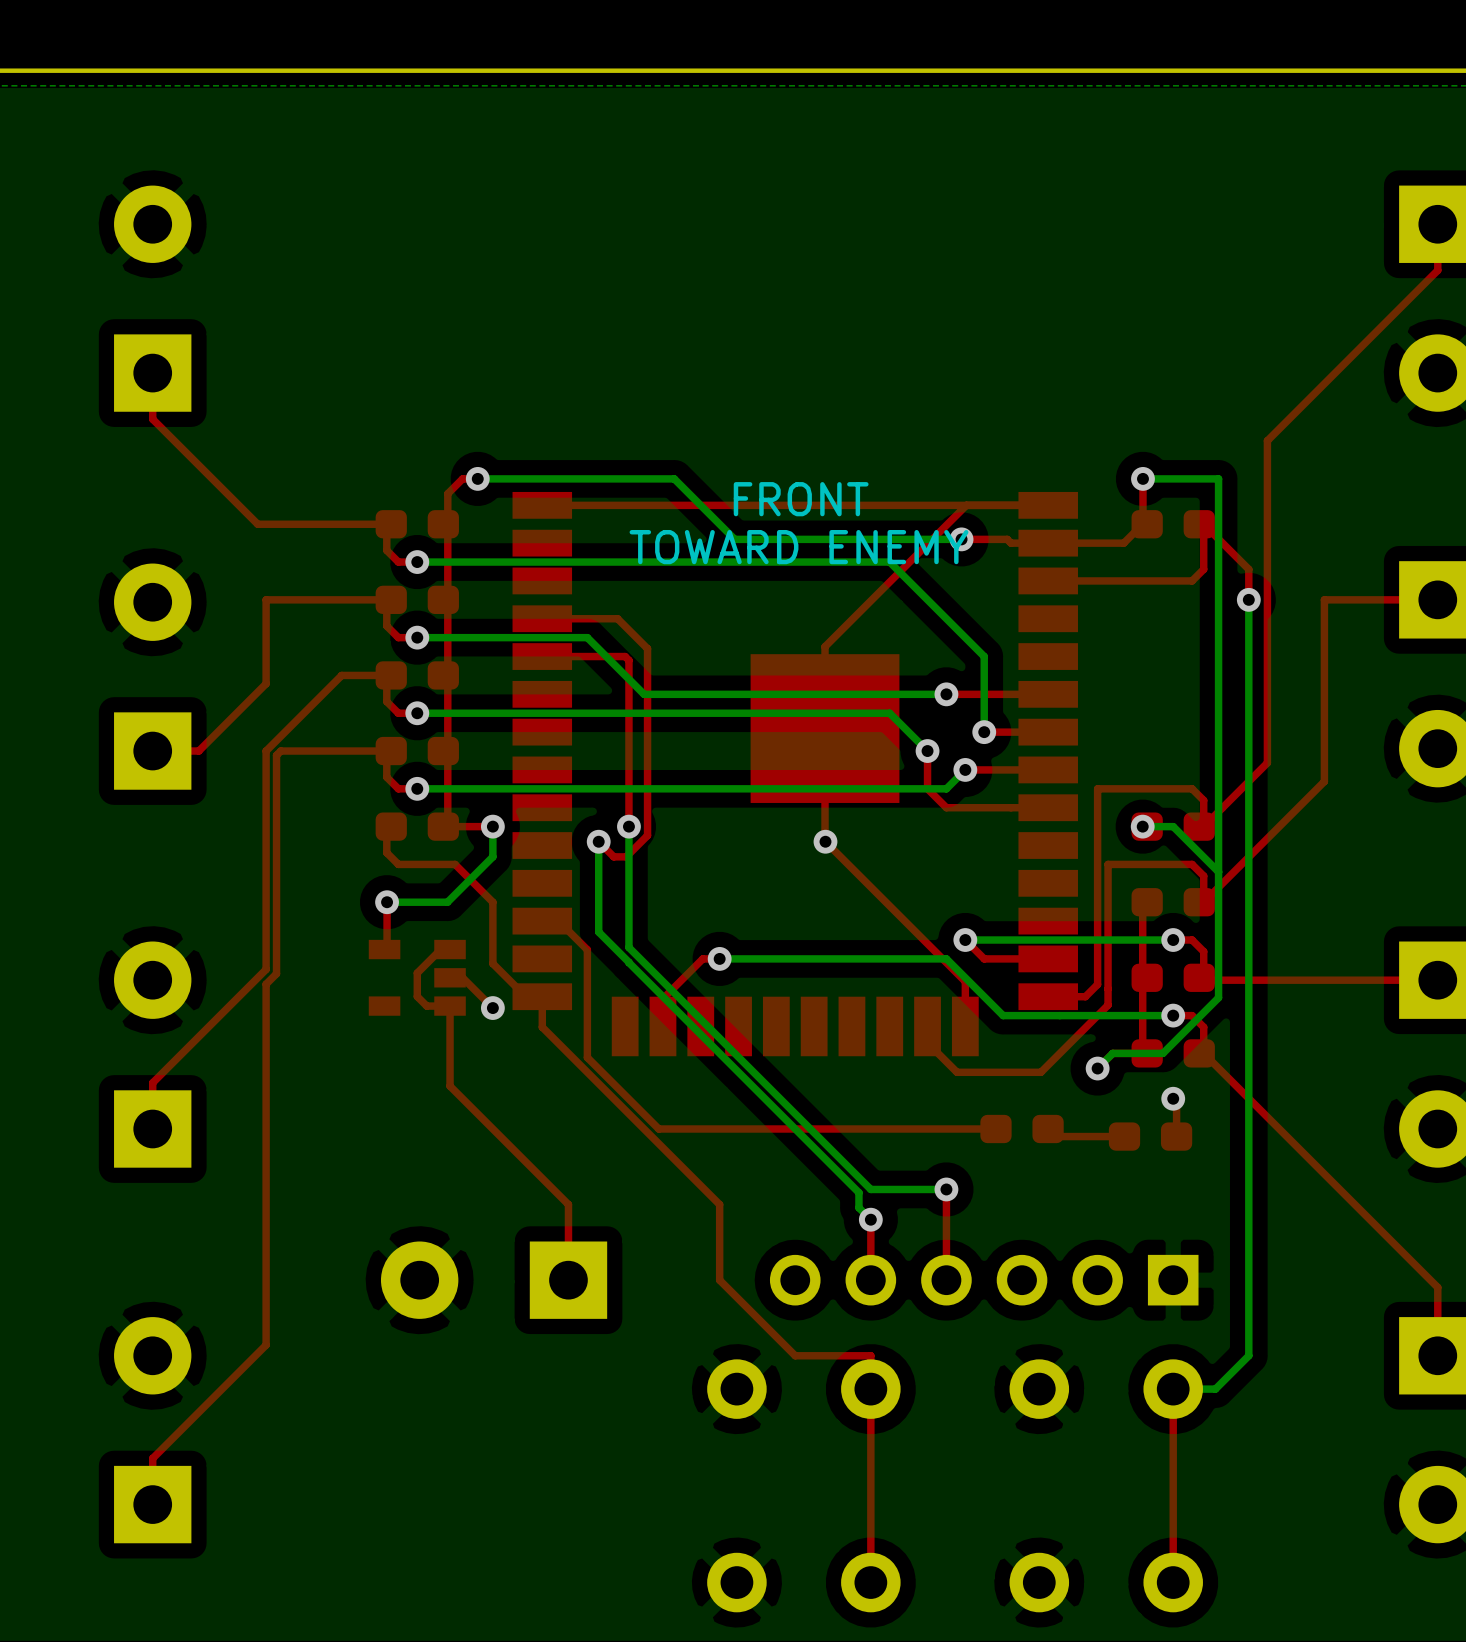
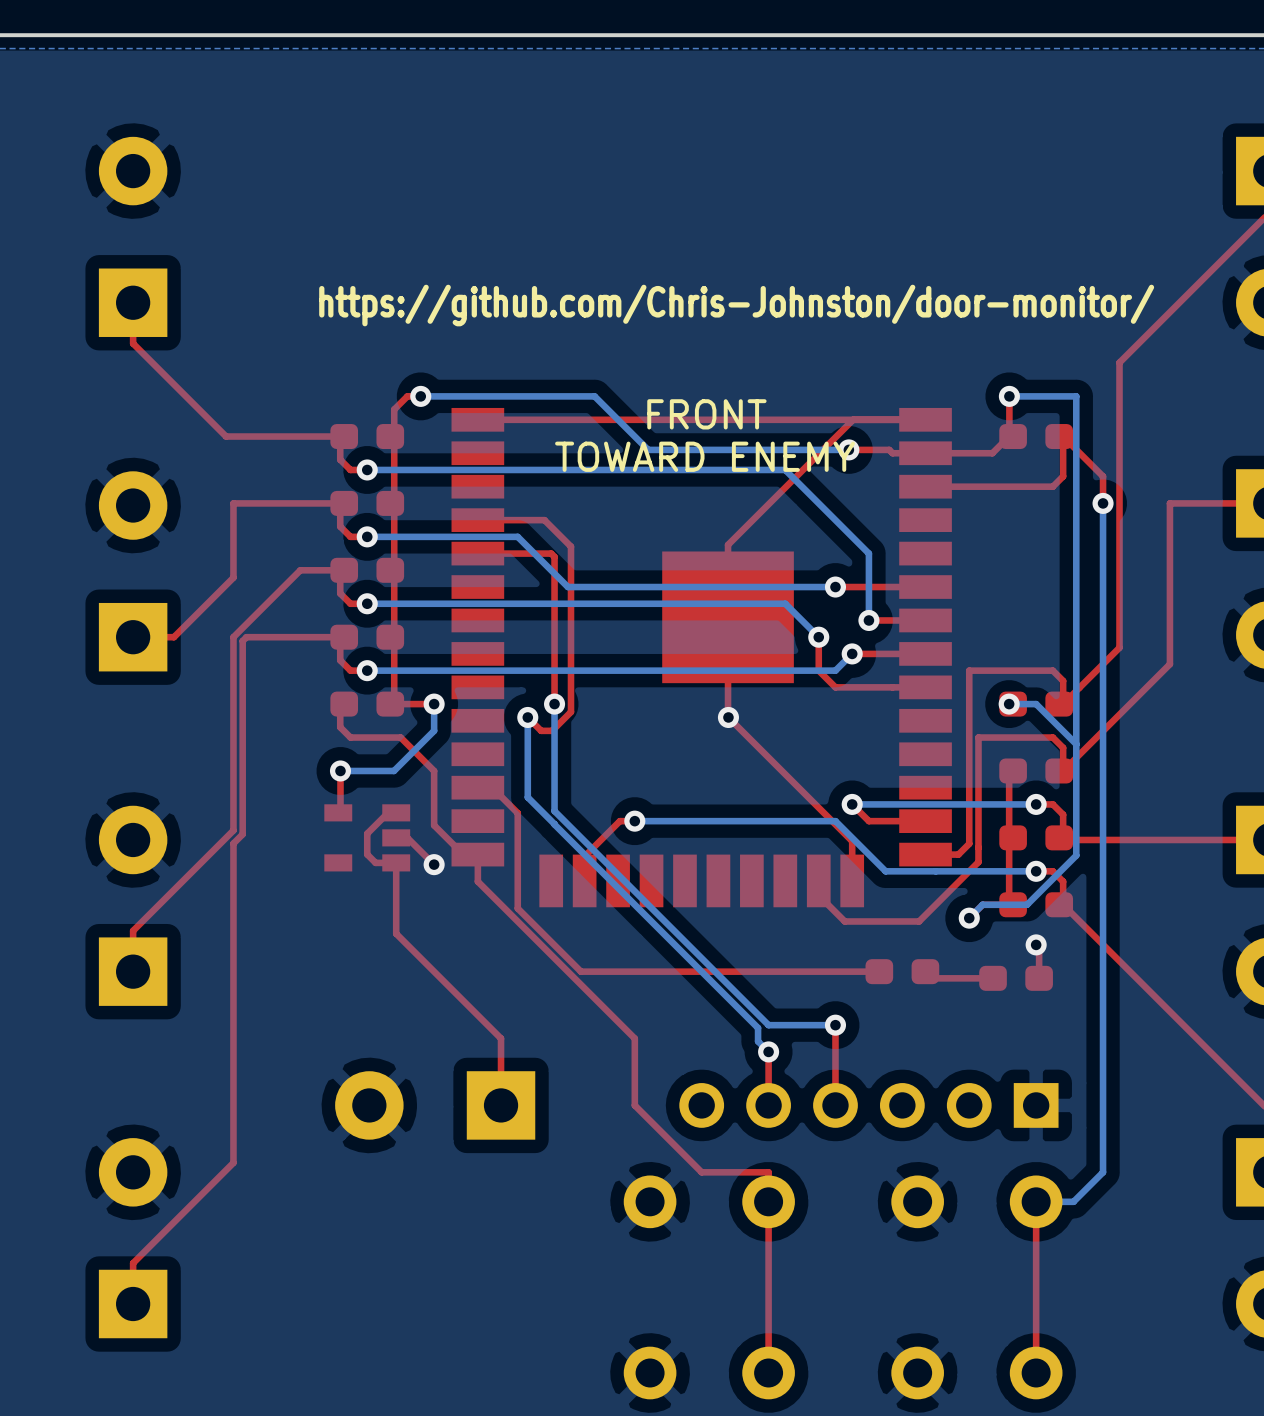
text: none -> https://github.com/Chris-Johnston/door-monitor/ (736, 305)

